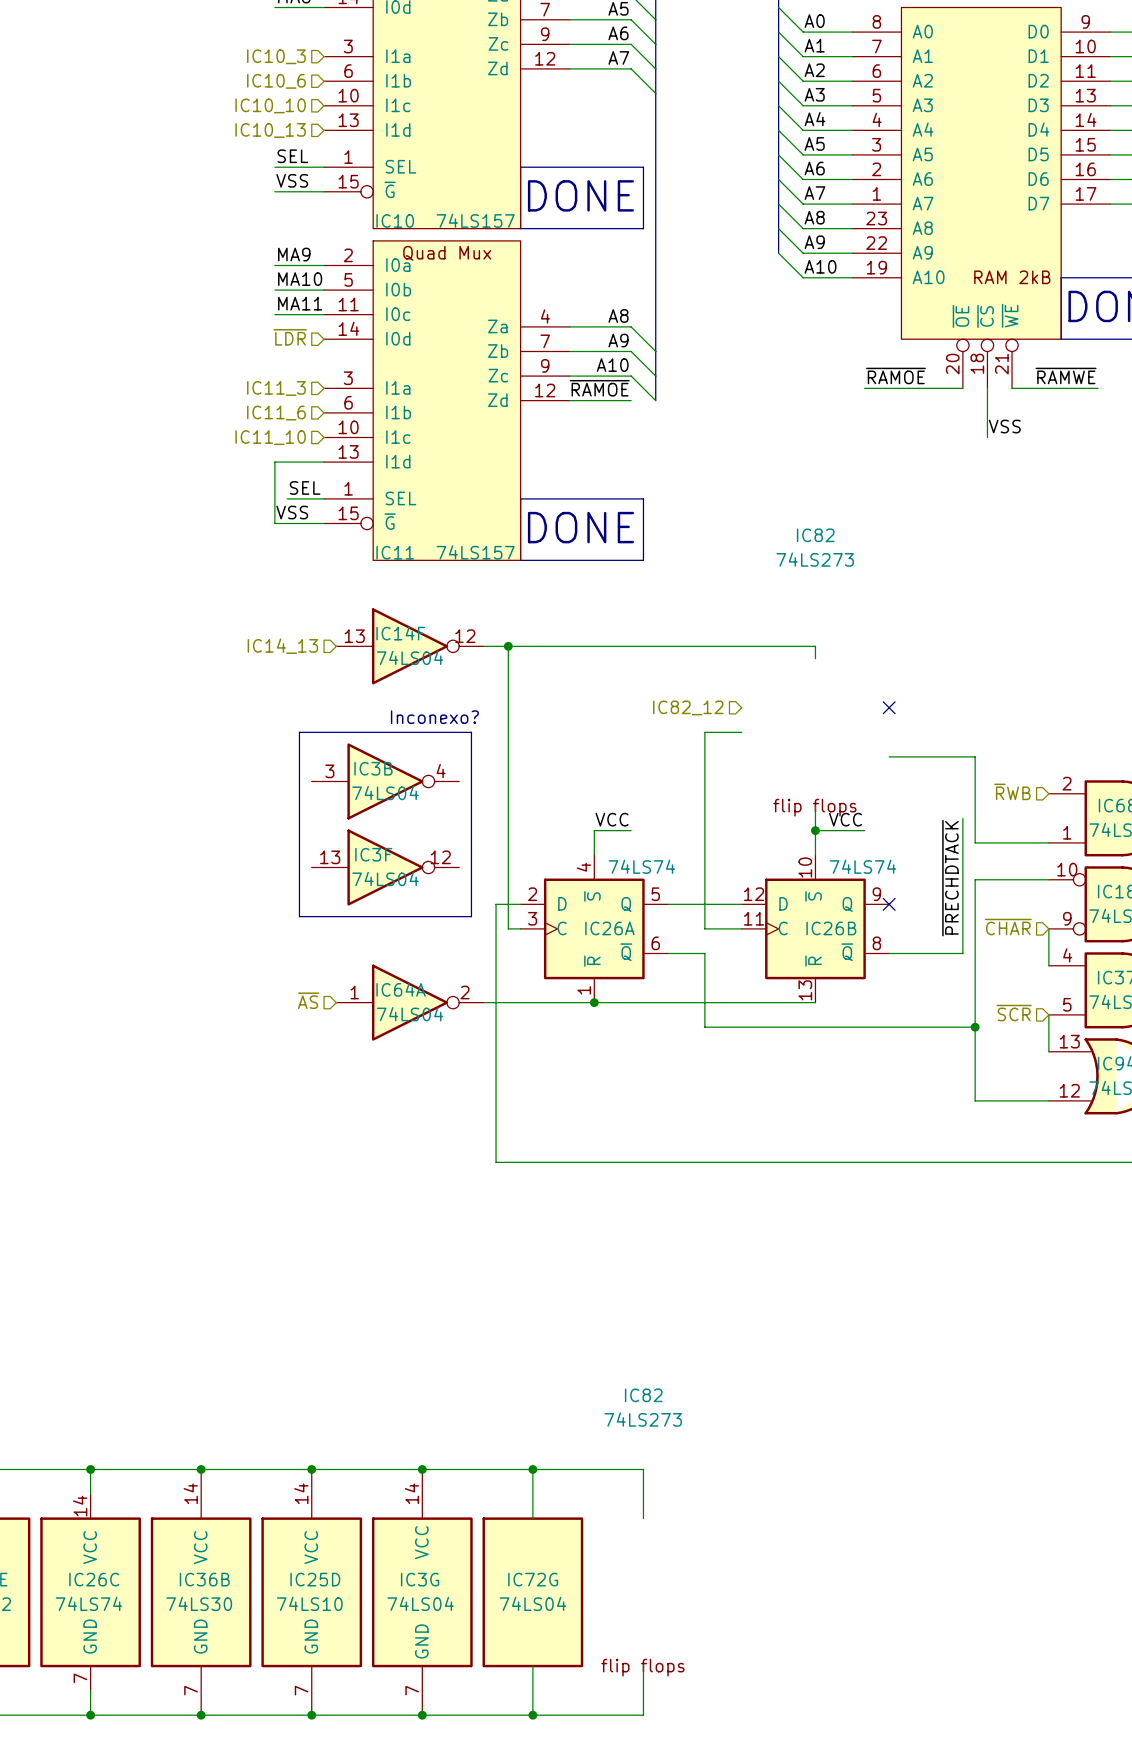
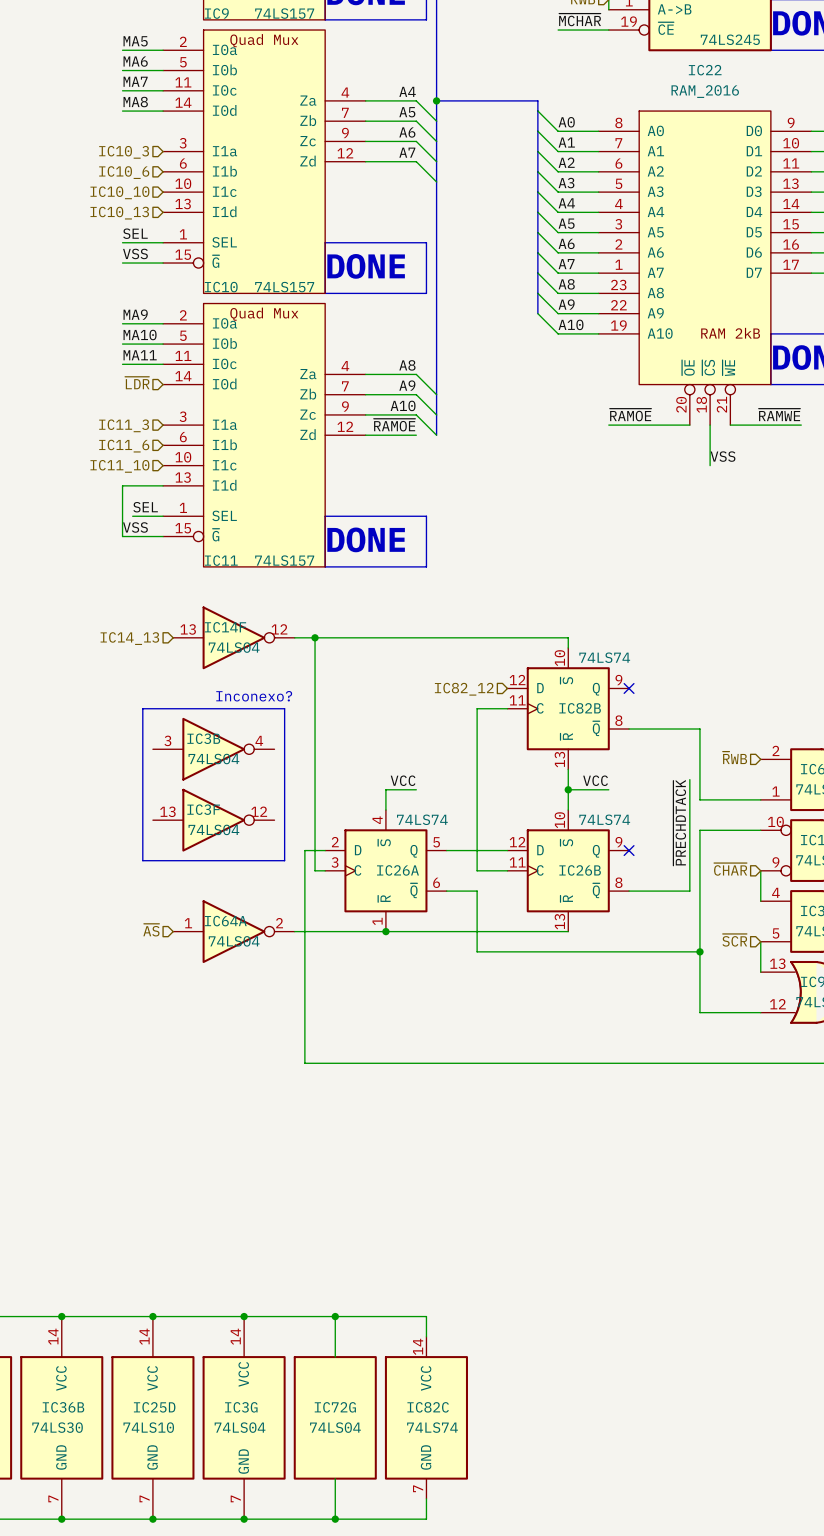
IC82: 74LS273 (814, 672) -> none
IC82B: none -> 74LS74 (568, 708)
IC82: 74LS273 (642, 1532) -> none
IC82C: none -> 74LS74 (426, 1417)

